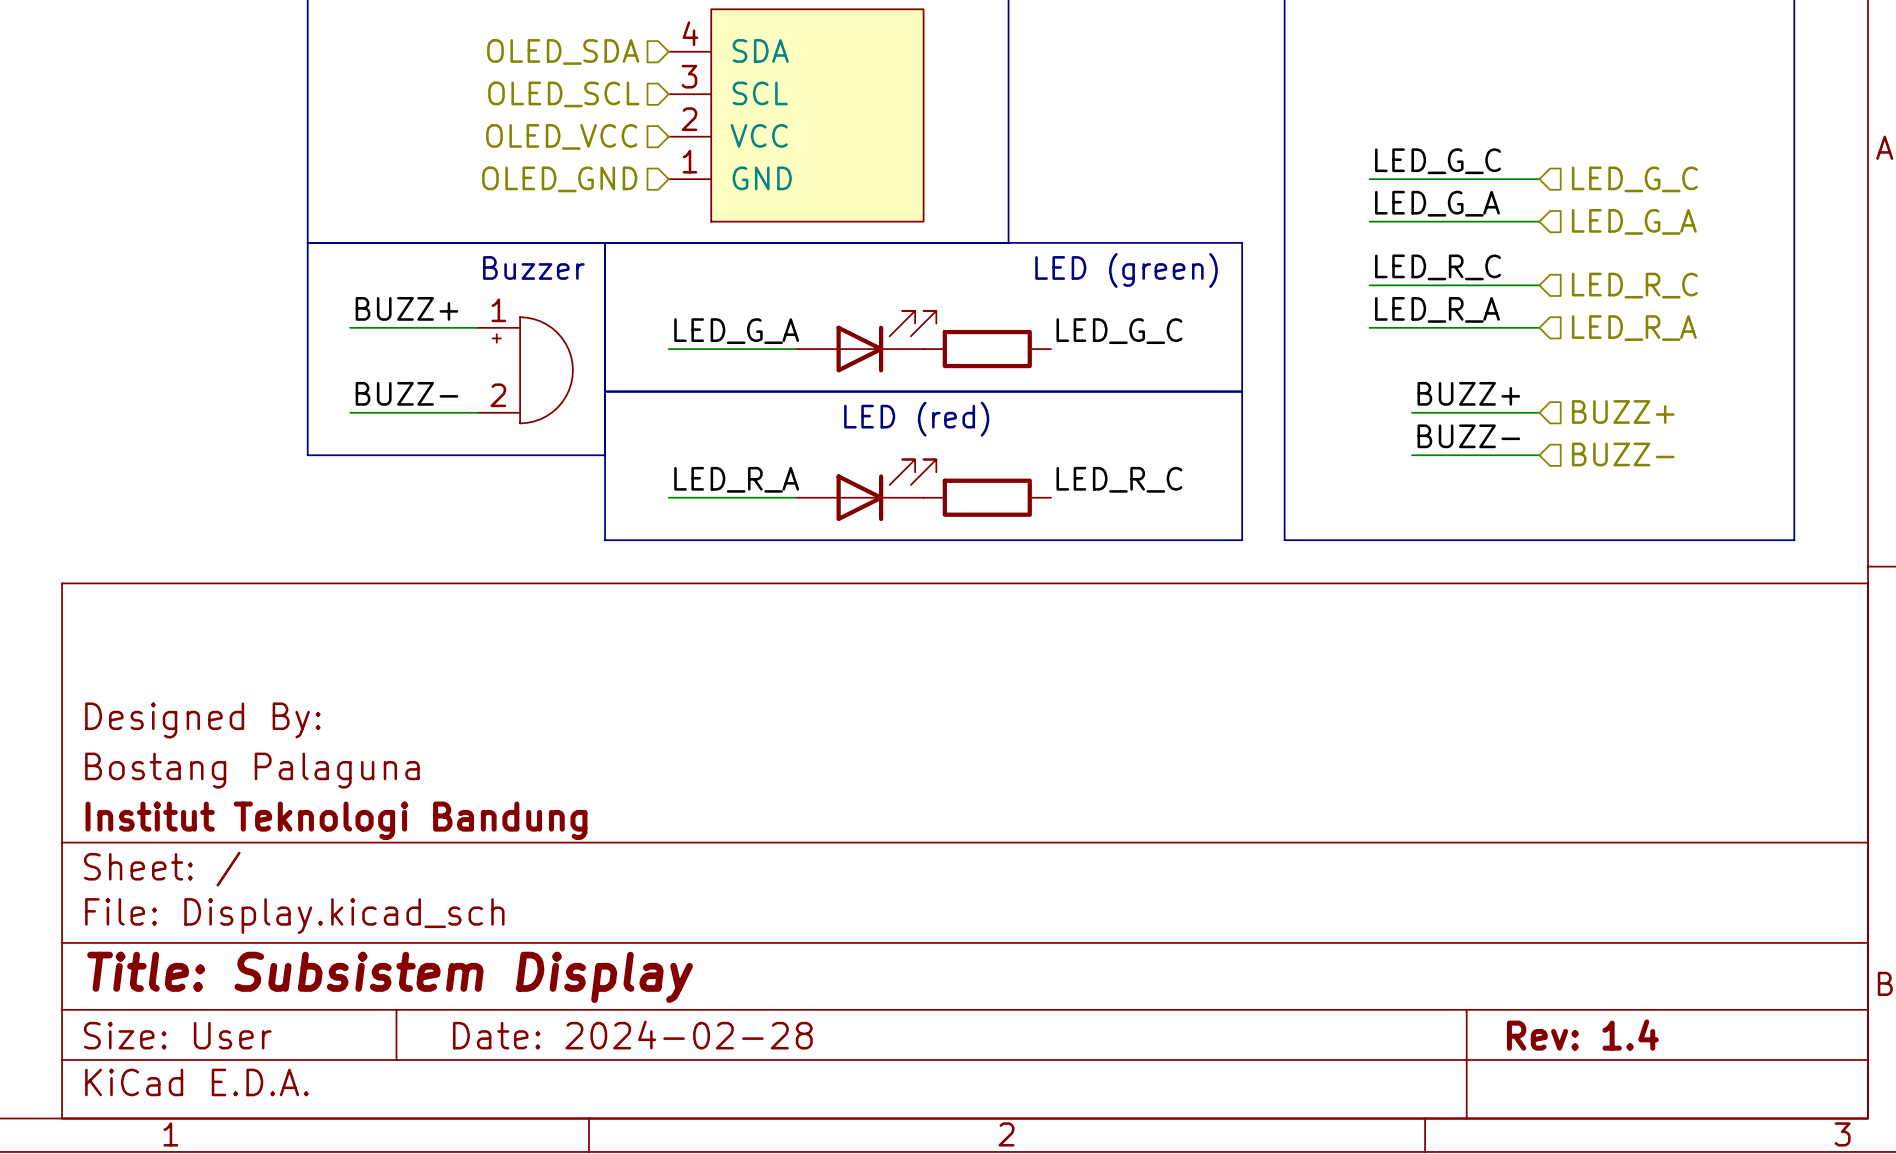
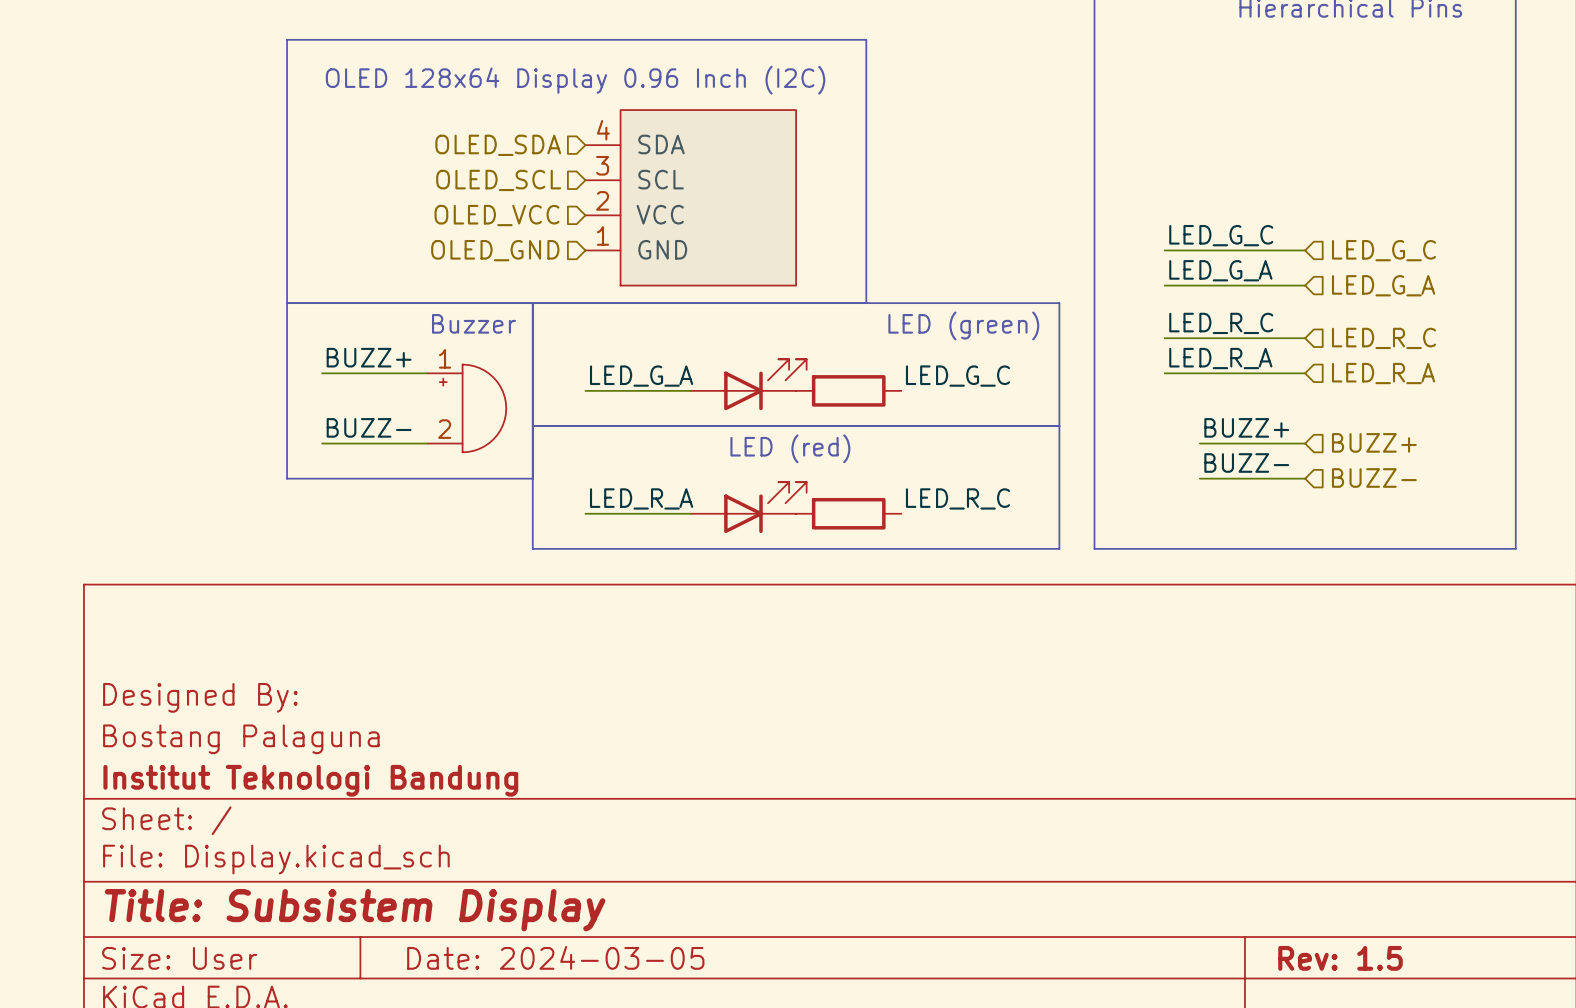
title block: Date: 2024-02-28 (632, 1035) -> Date: 2024-03-05 (555, 957)
title block: Rev: 1.4 (1582, 1035) -> Rev: 1.5 (1340, 958)

